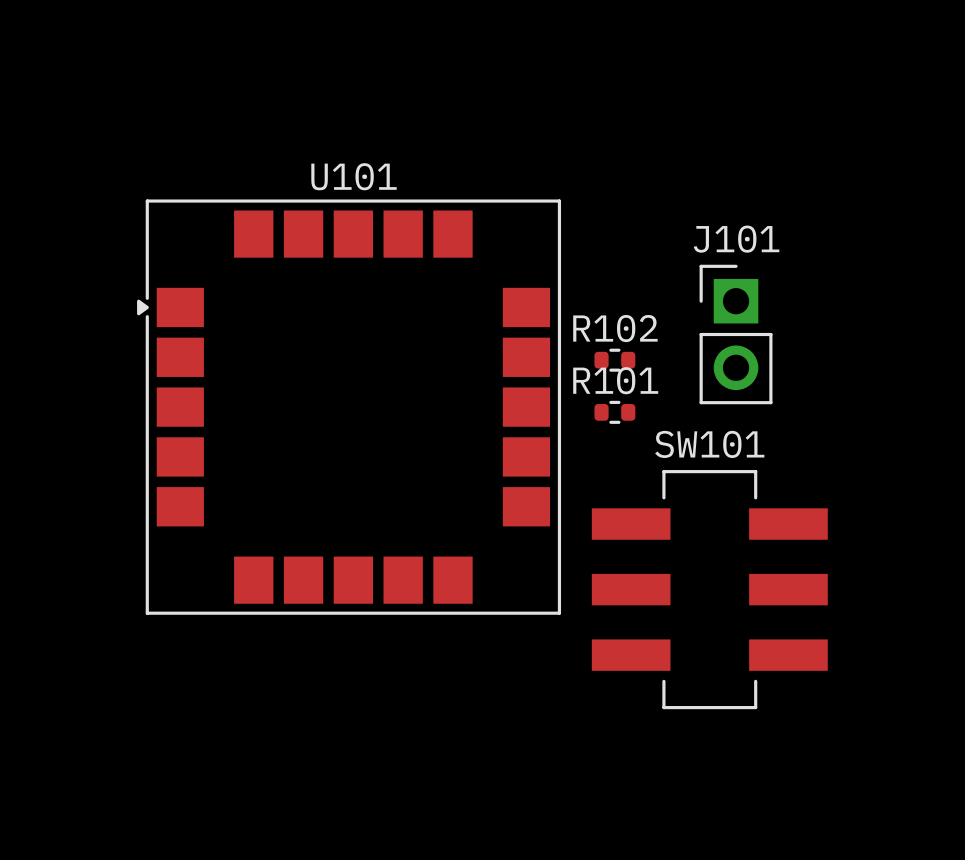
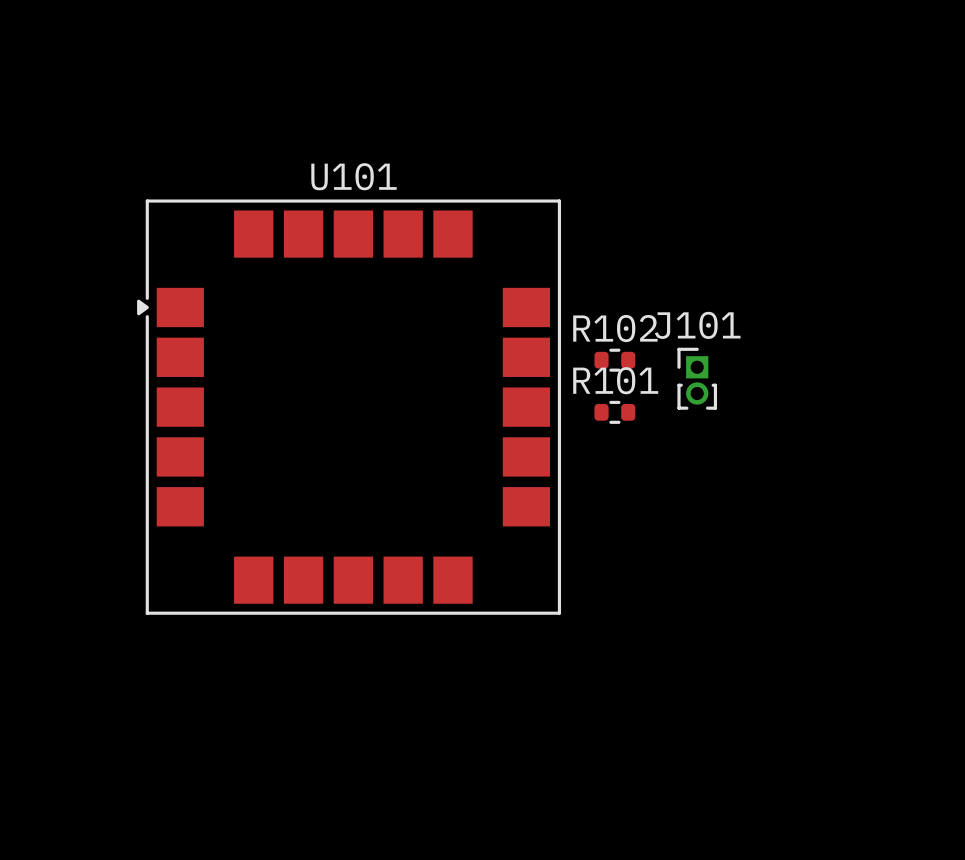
J101 footprint: [699, 264, 773, 405] -> [677, 347, 718, 410]
SW101: (709, 589) -> none

